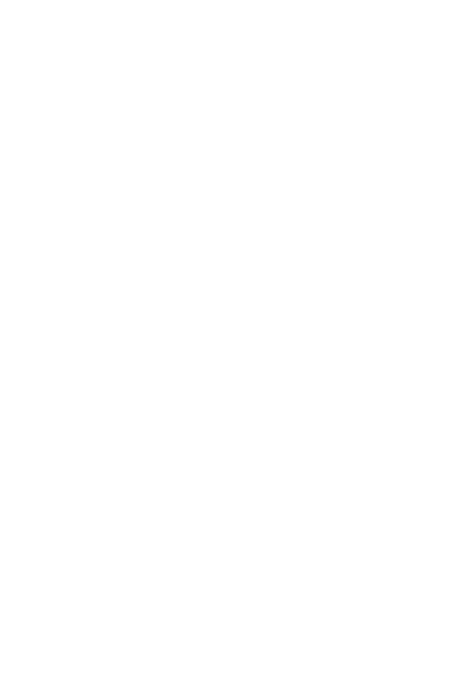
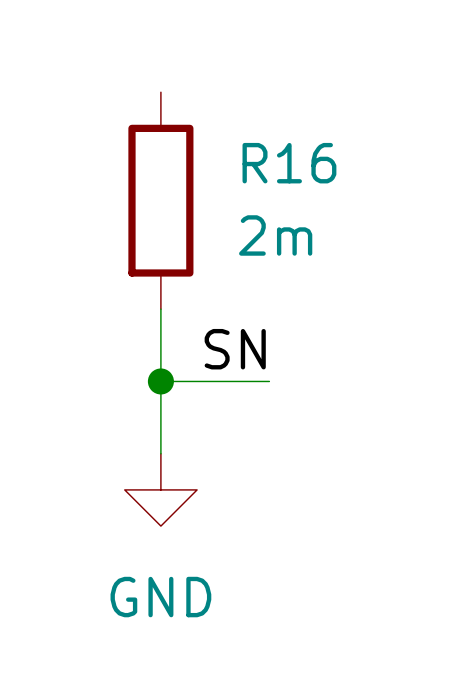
R16: none -> 2m (160, 200)
wire: none -> (160, 309) (160, 453)
label: none -> SN (235, 349)
wire: none -> (160, 381) (269, 381)
junction: none -> (160, 381)
power symbol: none -> GND (160, 489)

